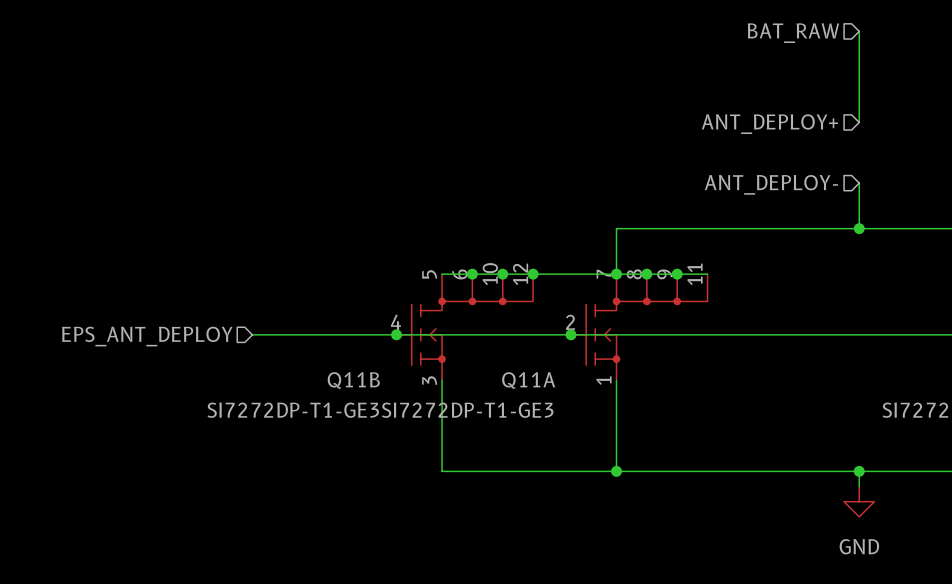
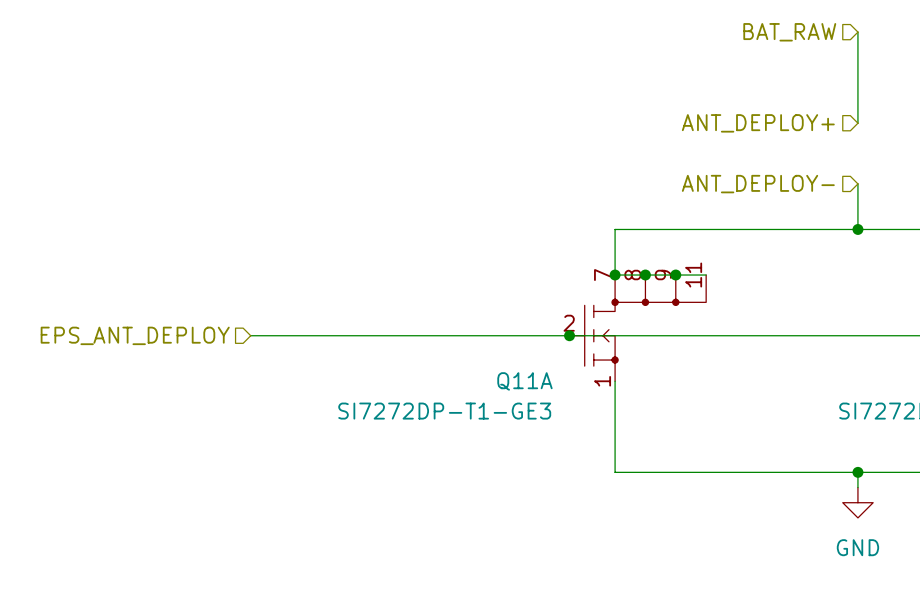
wire: (442, 274) (616, 274) -> none
junction: (472, 274) -> none
junction: (502, 274) -> none
junction: (533, 274) -> none
Q11B: SI7272DP-T1-GE3 (464, 327) -> none
junction: (396, 334) -> none
wire: (442, 380) (442, 471) (616, 471) -> none
junction: (616, 471) -> none

